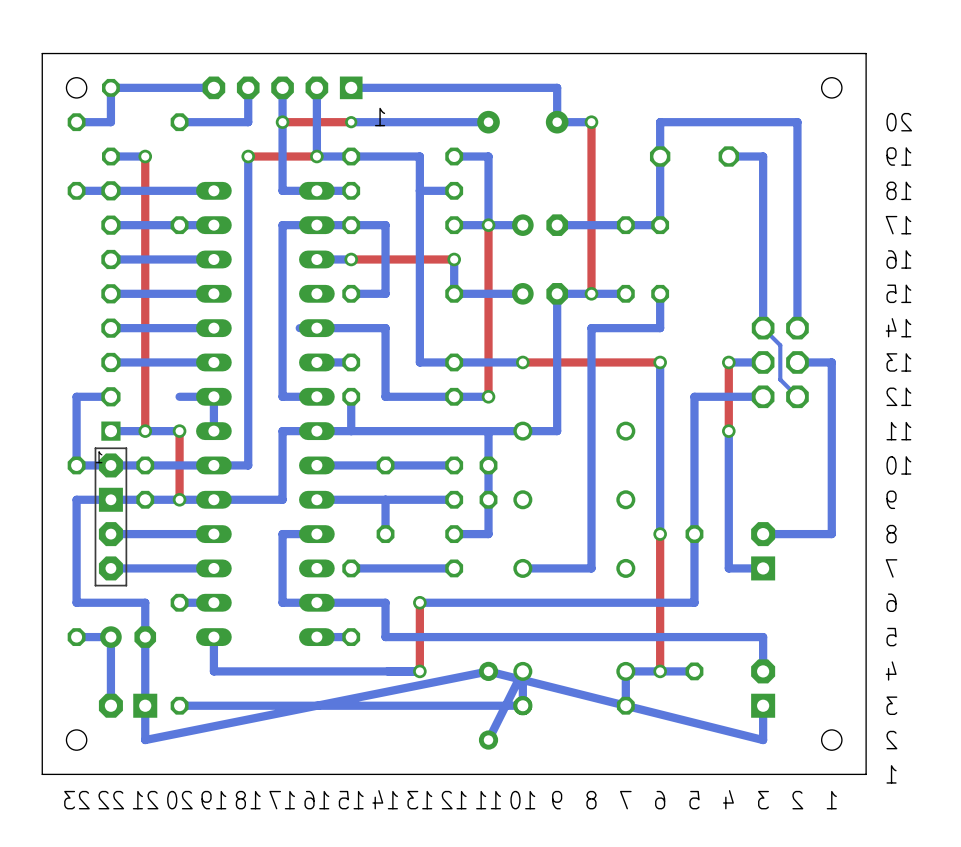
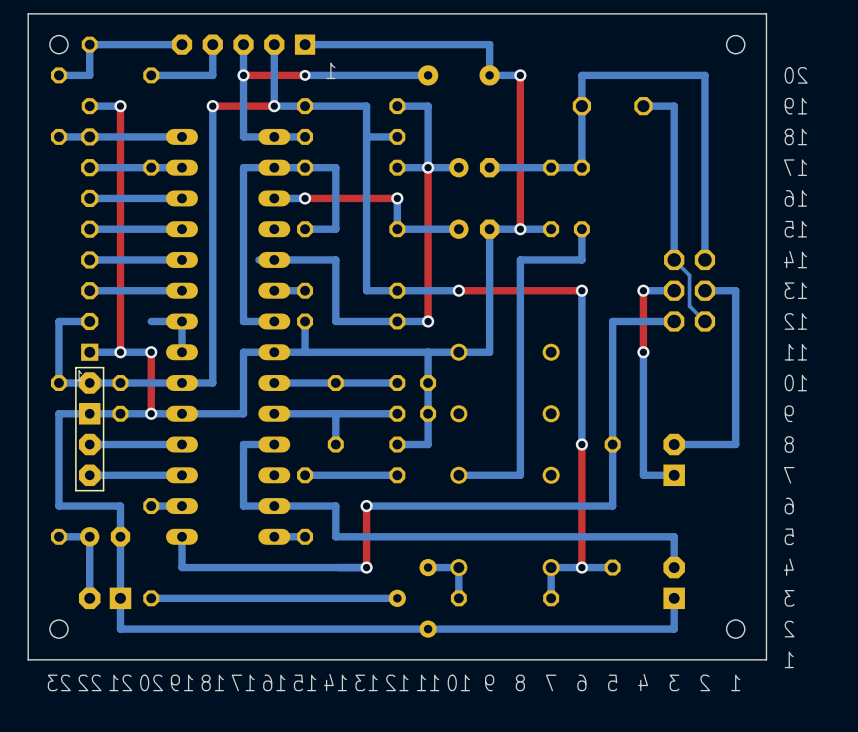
bottom track: (522, 671) (488, 740) -> (458, 567) (428, 567)
part rotation: 0° (505, 705) -> 180° (412, 598)
bottom track: (522, 705) (454, 705) -> none
bottom track: (763, 740) (488, 671) (145, 740) -> (674, 629) (120, 629)

